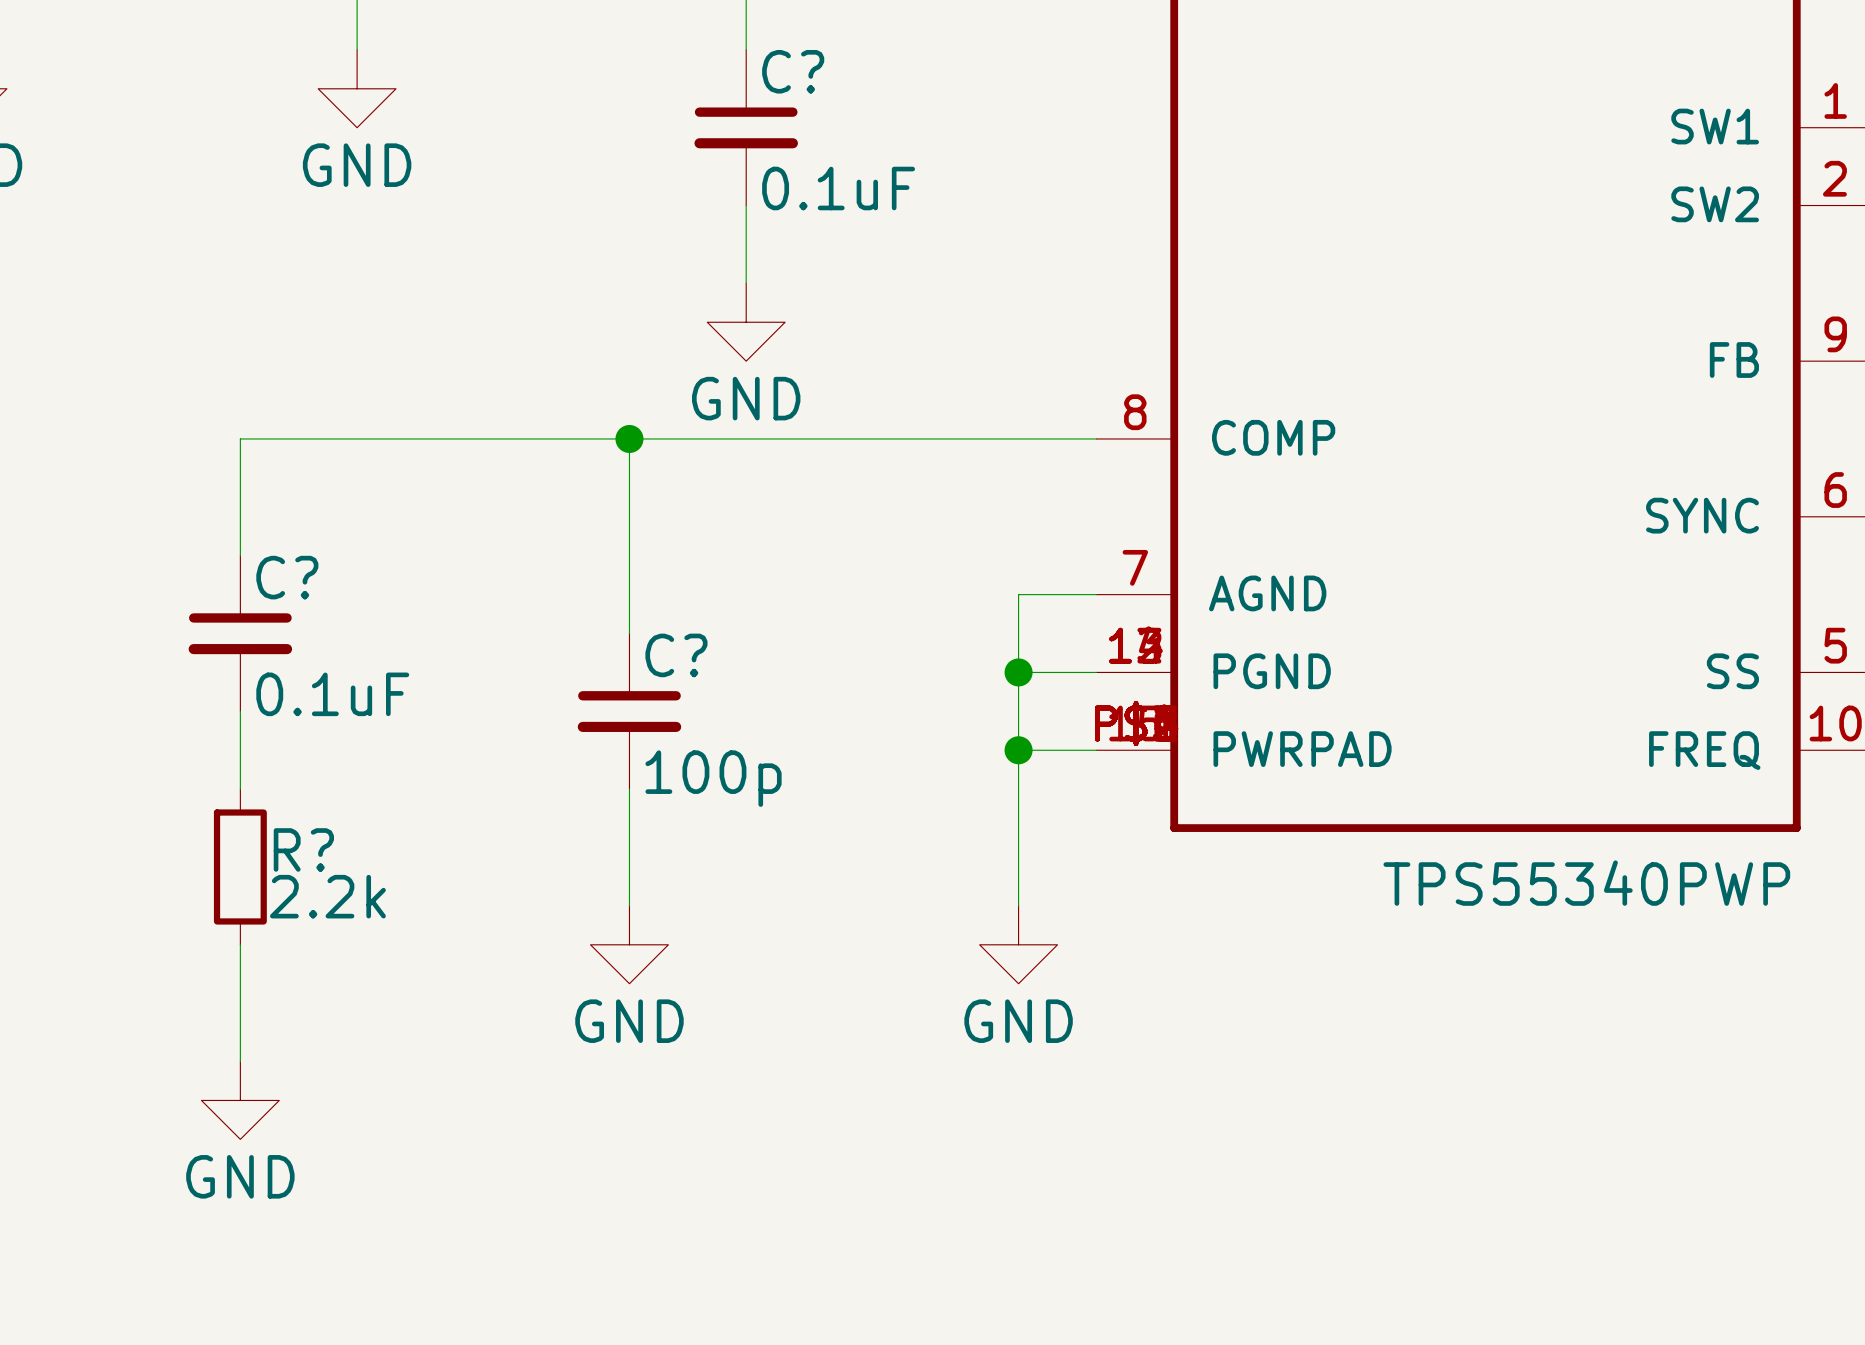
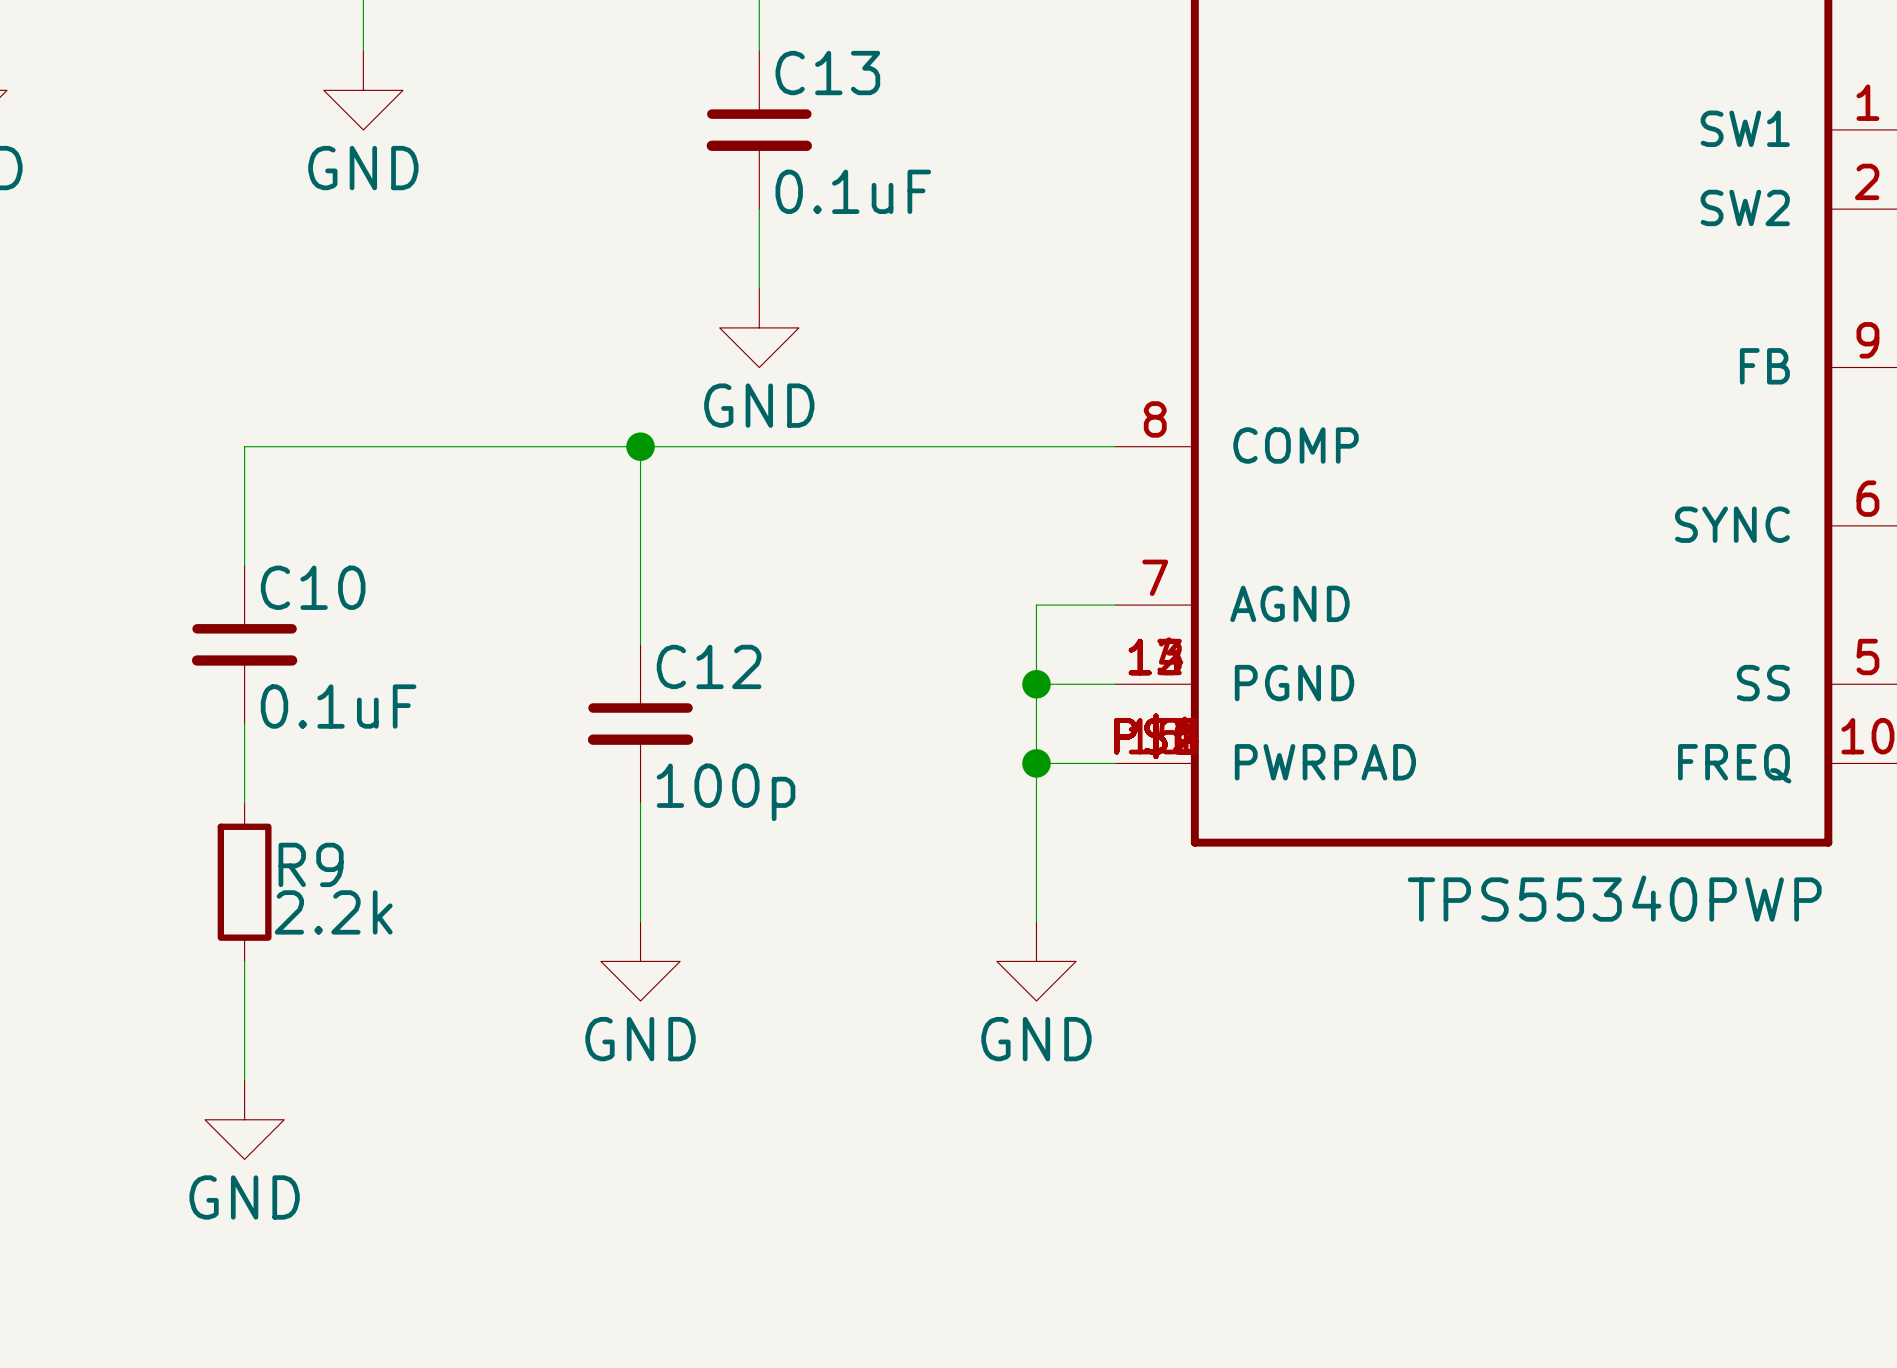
C? name: C? (793, 71) -> C13 (827, 73)
C? name: C? (287, 577) -> C10 (313, 587)
C? name: C? (676, 655) -> C12 (709, 666)
R? name: R? (303, 849) -> R9 (311, 864)

